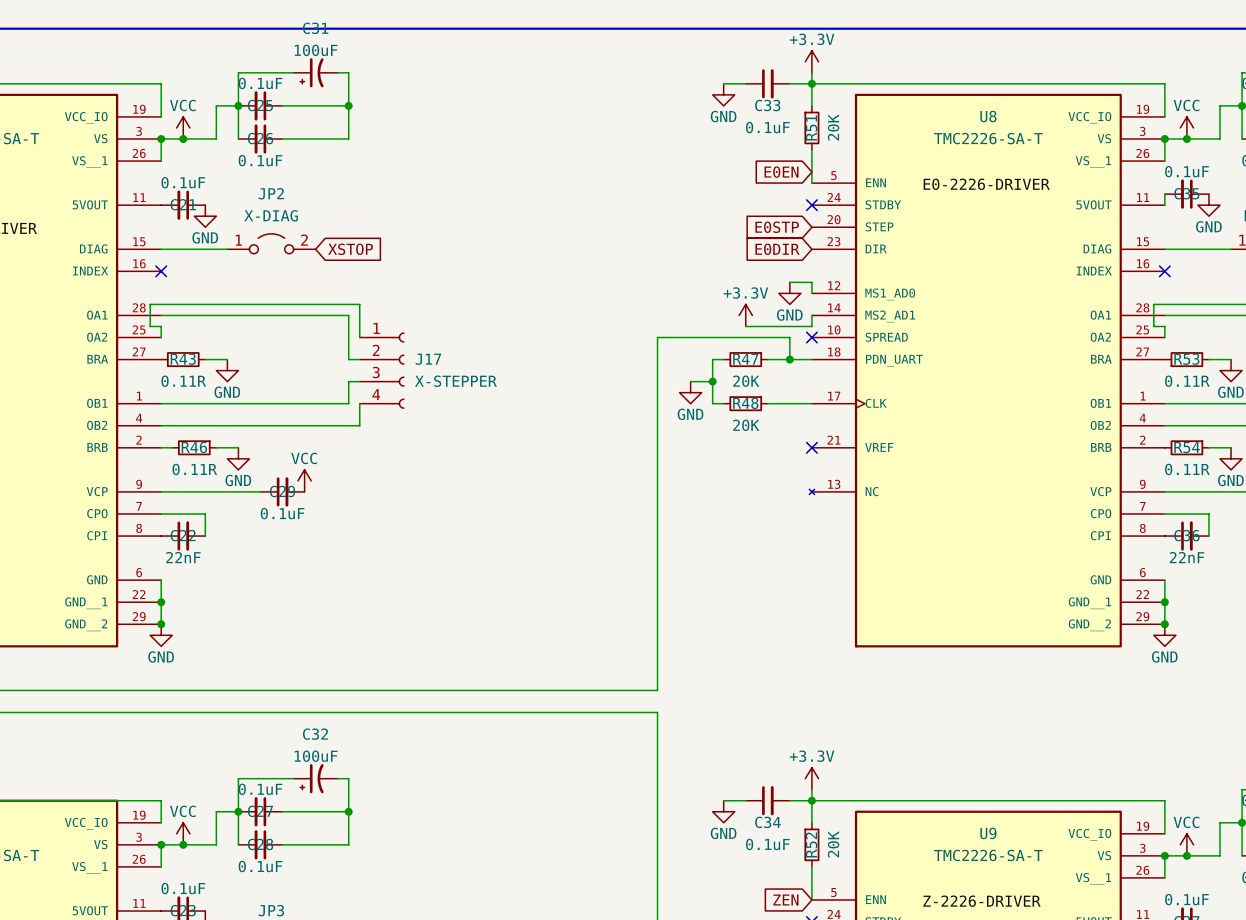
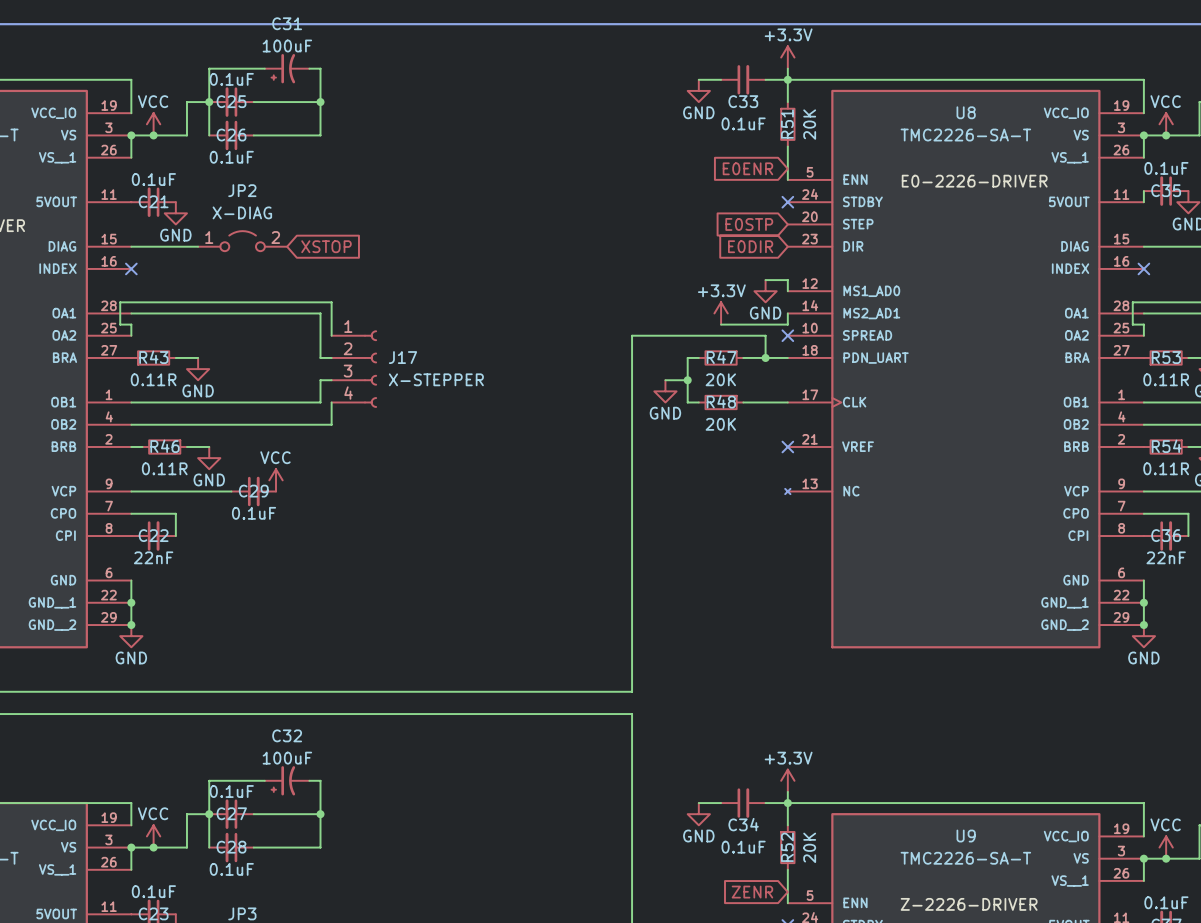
global label: E0EN (781, 172) -> E0ENR (747, 168)
global label: ZEN (785, 899) -> ZENR (752, 892)

